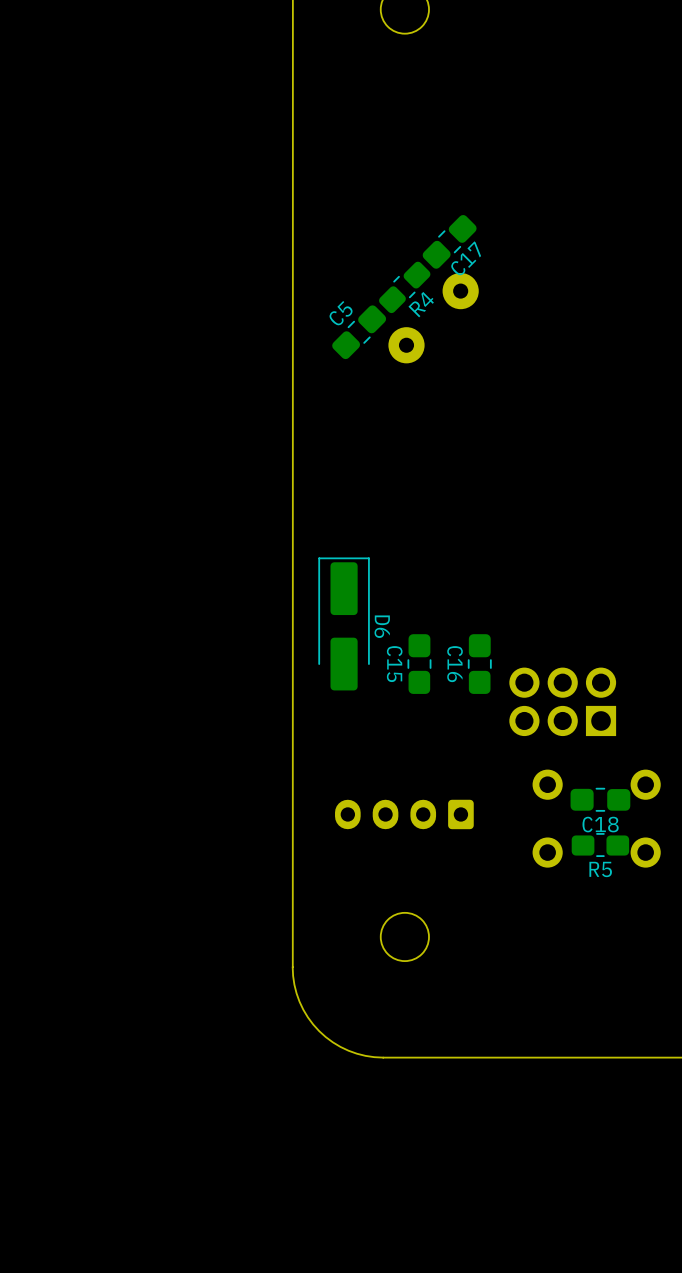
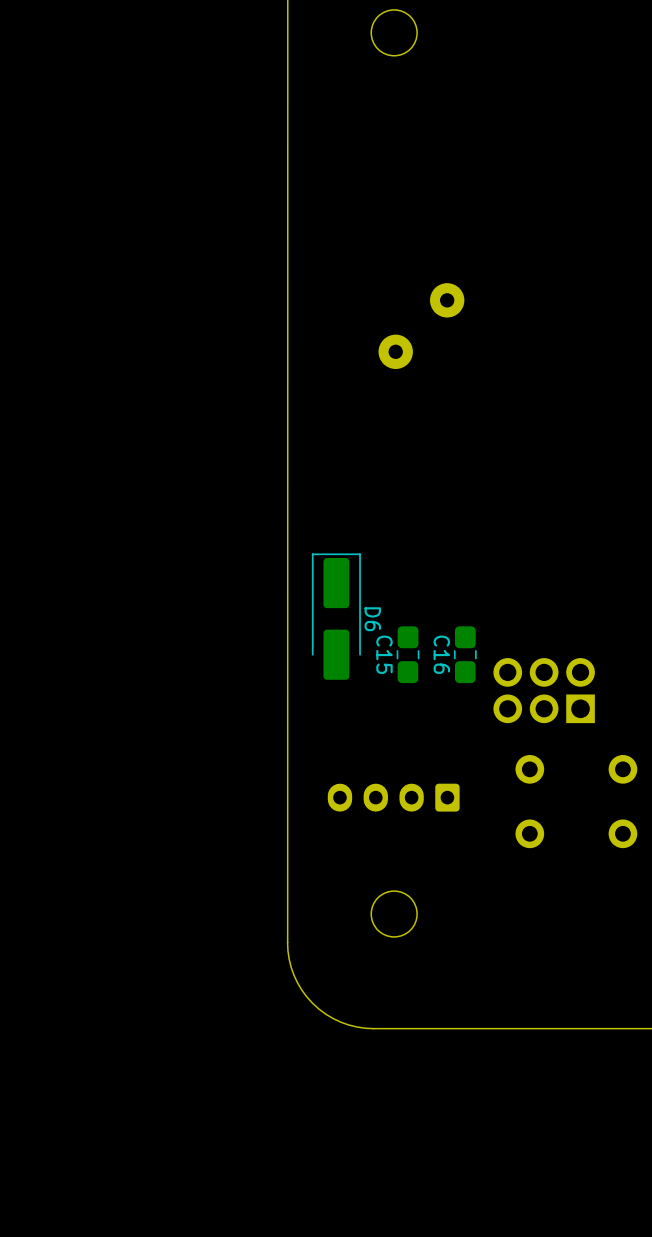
C17: (449, 241) -> none
R4: (404, 287) -> none
C5: (359, 332) -> none
C18: (600, 799) -> none
R5: (600, 845) -> none

